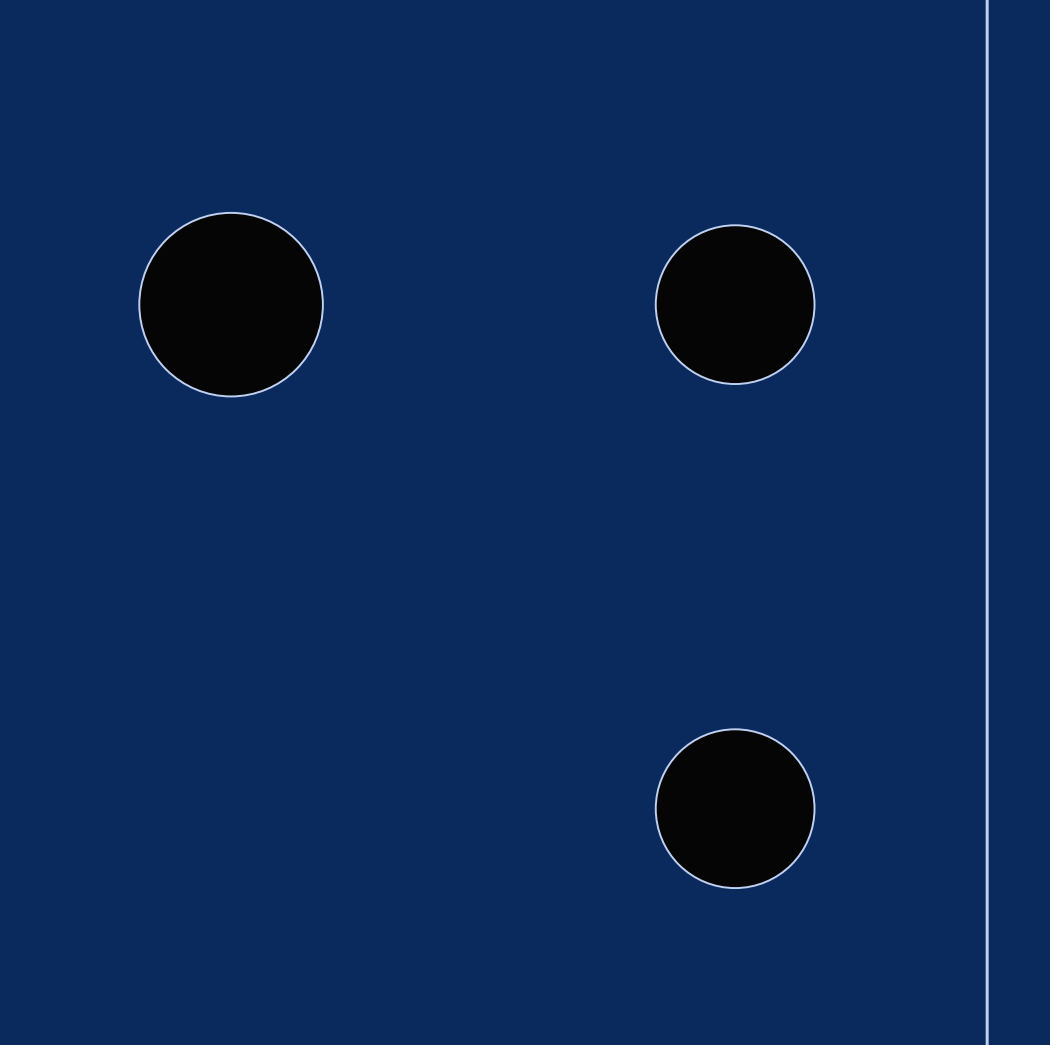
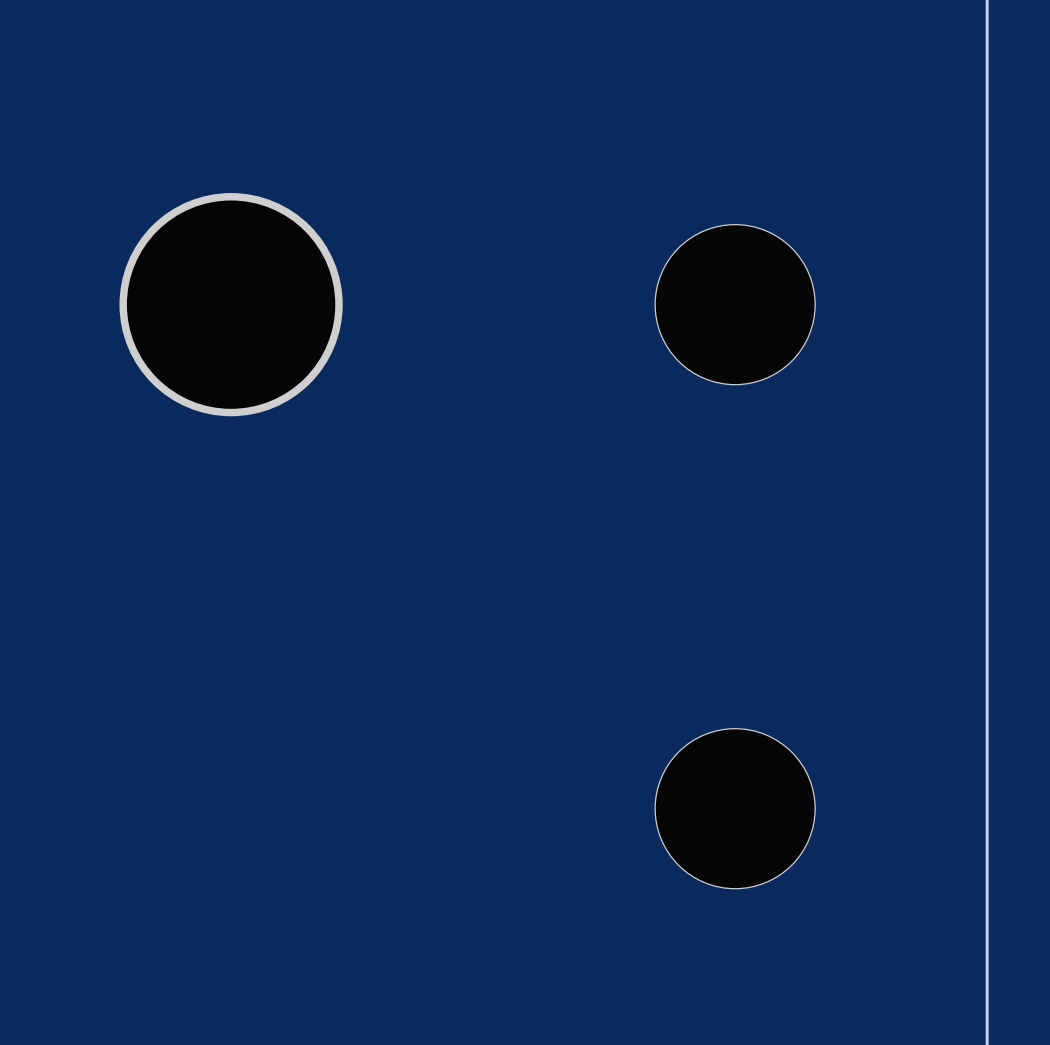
part footprint: [139, 212, 323, 397] -> [119, 193, 343, 417]
part footprint: [655, 225, 815, 385] -> [654, 224, 816, 386]
part footprint: [655, 729, 815, 889] -> [654, 728, 816, 890]

